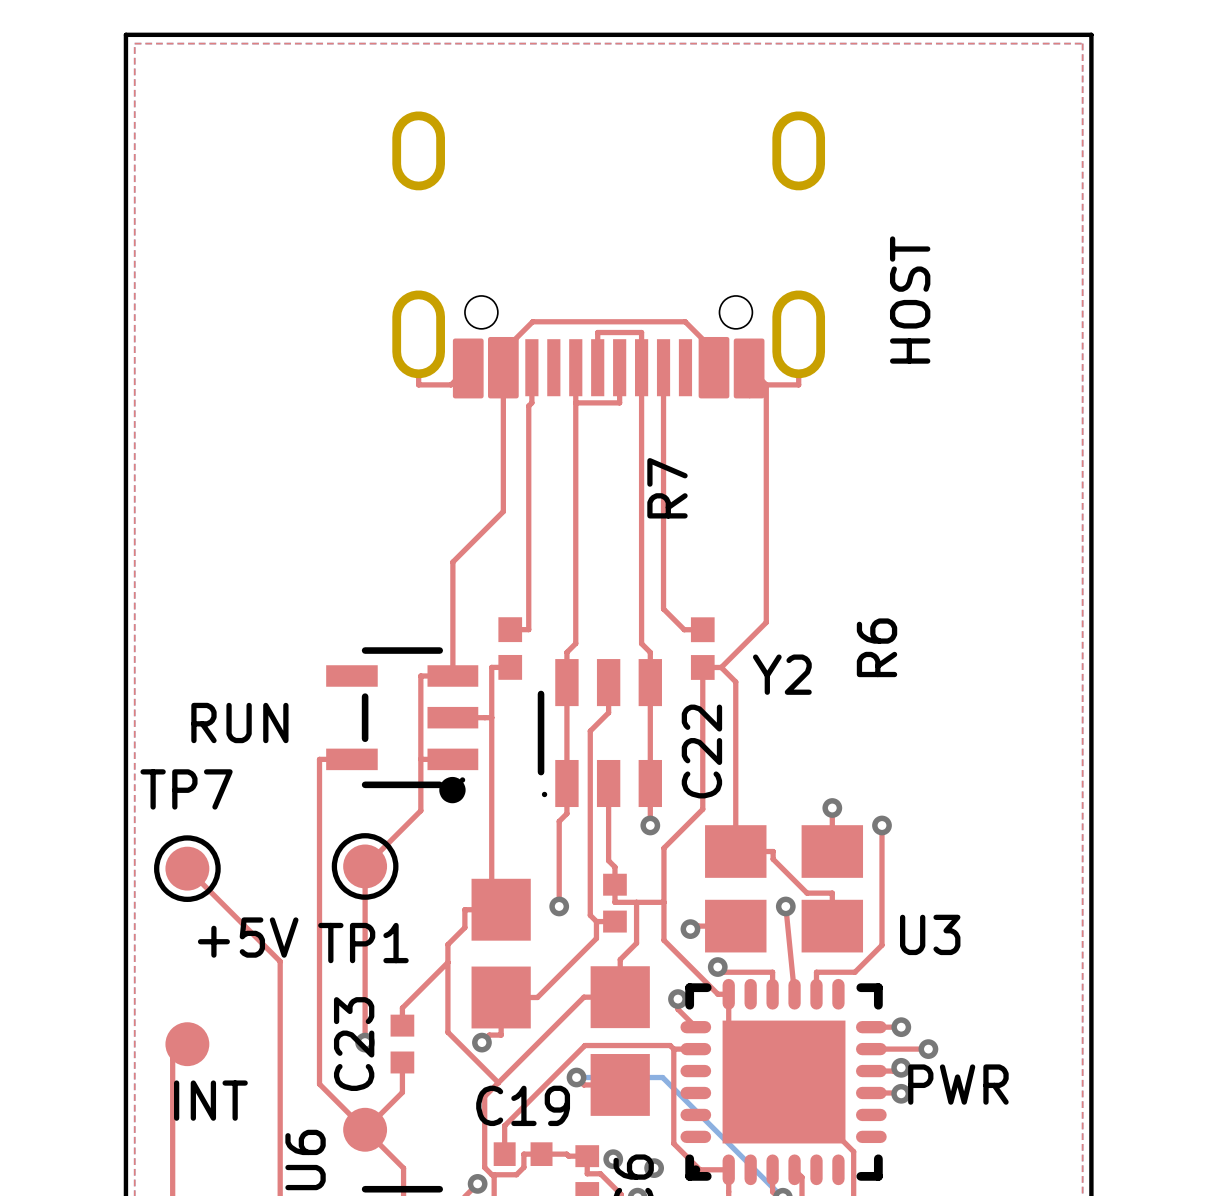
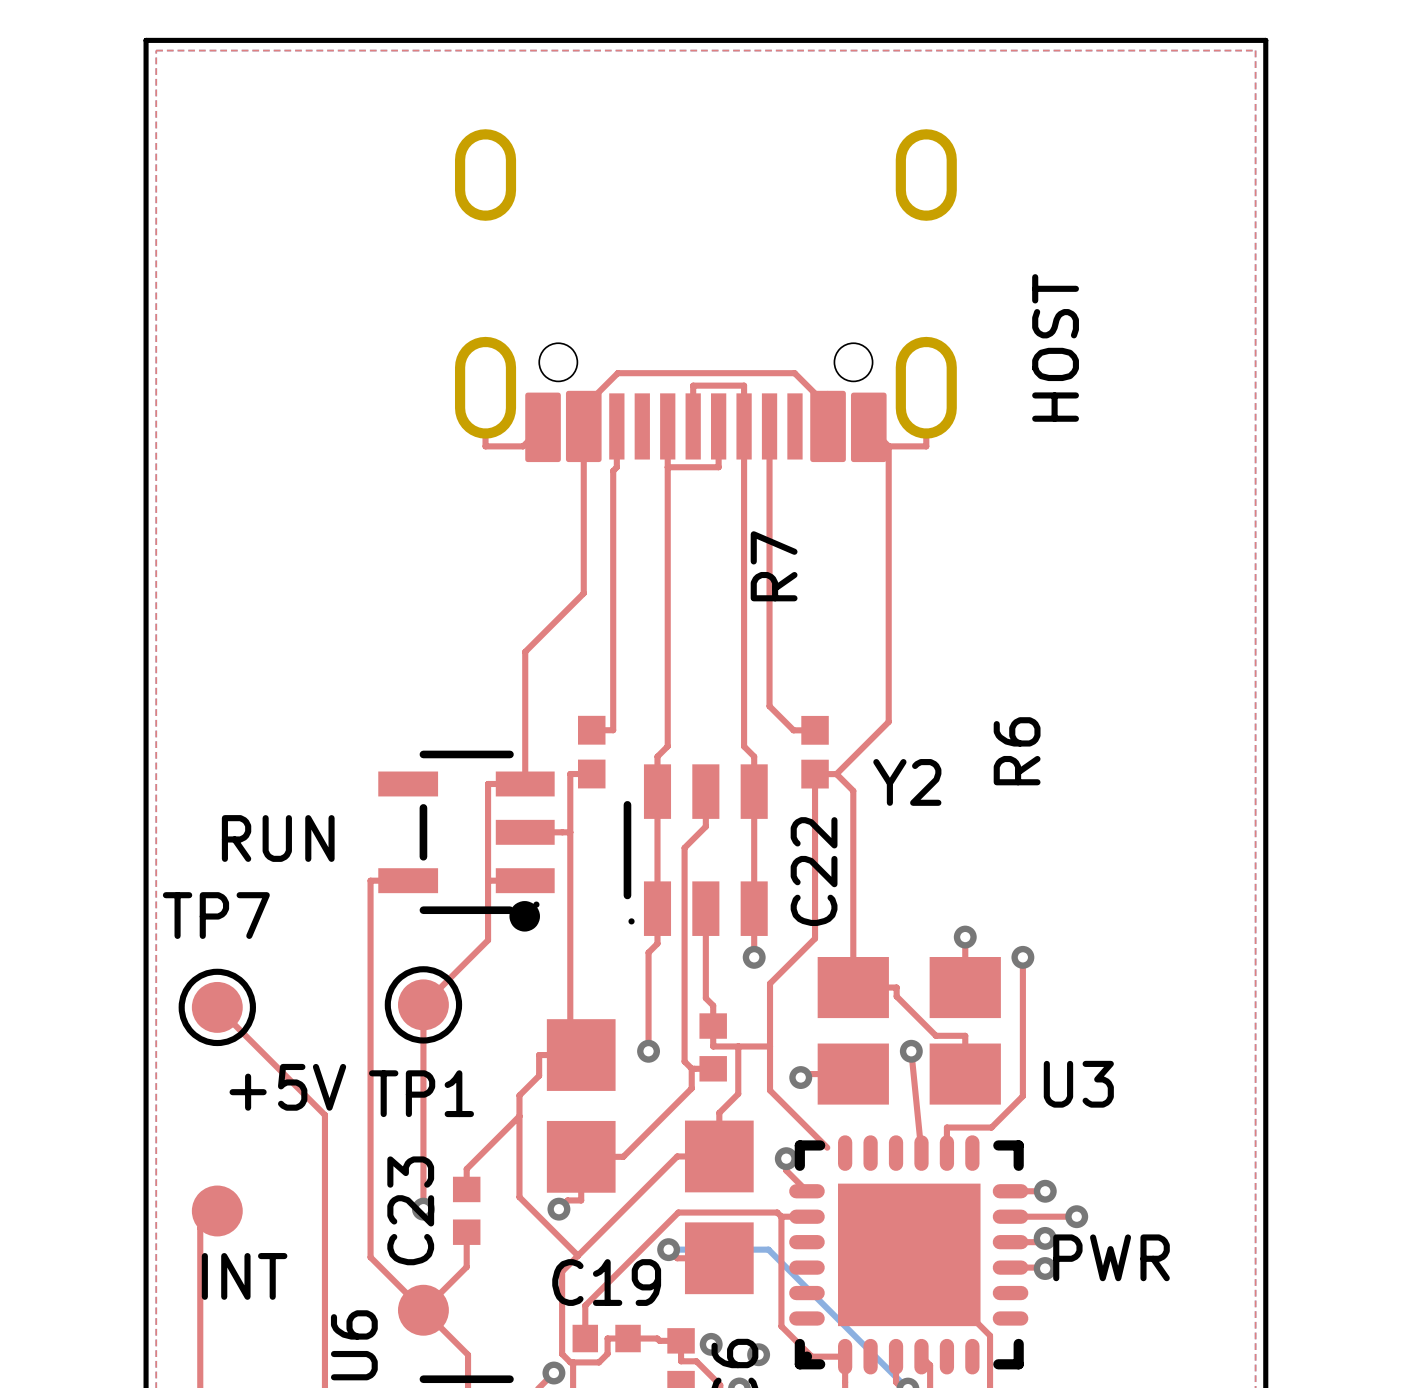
top track: (717, 967) (722, 972) (772, 972) (772, 994) -> none
via: (717, 967) -> none
top track: (713, 989) (717, 994) (728, 994) (728, 1026) -> none

